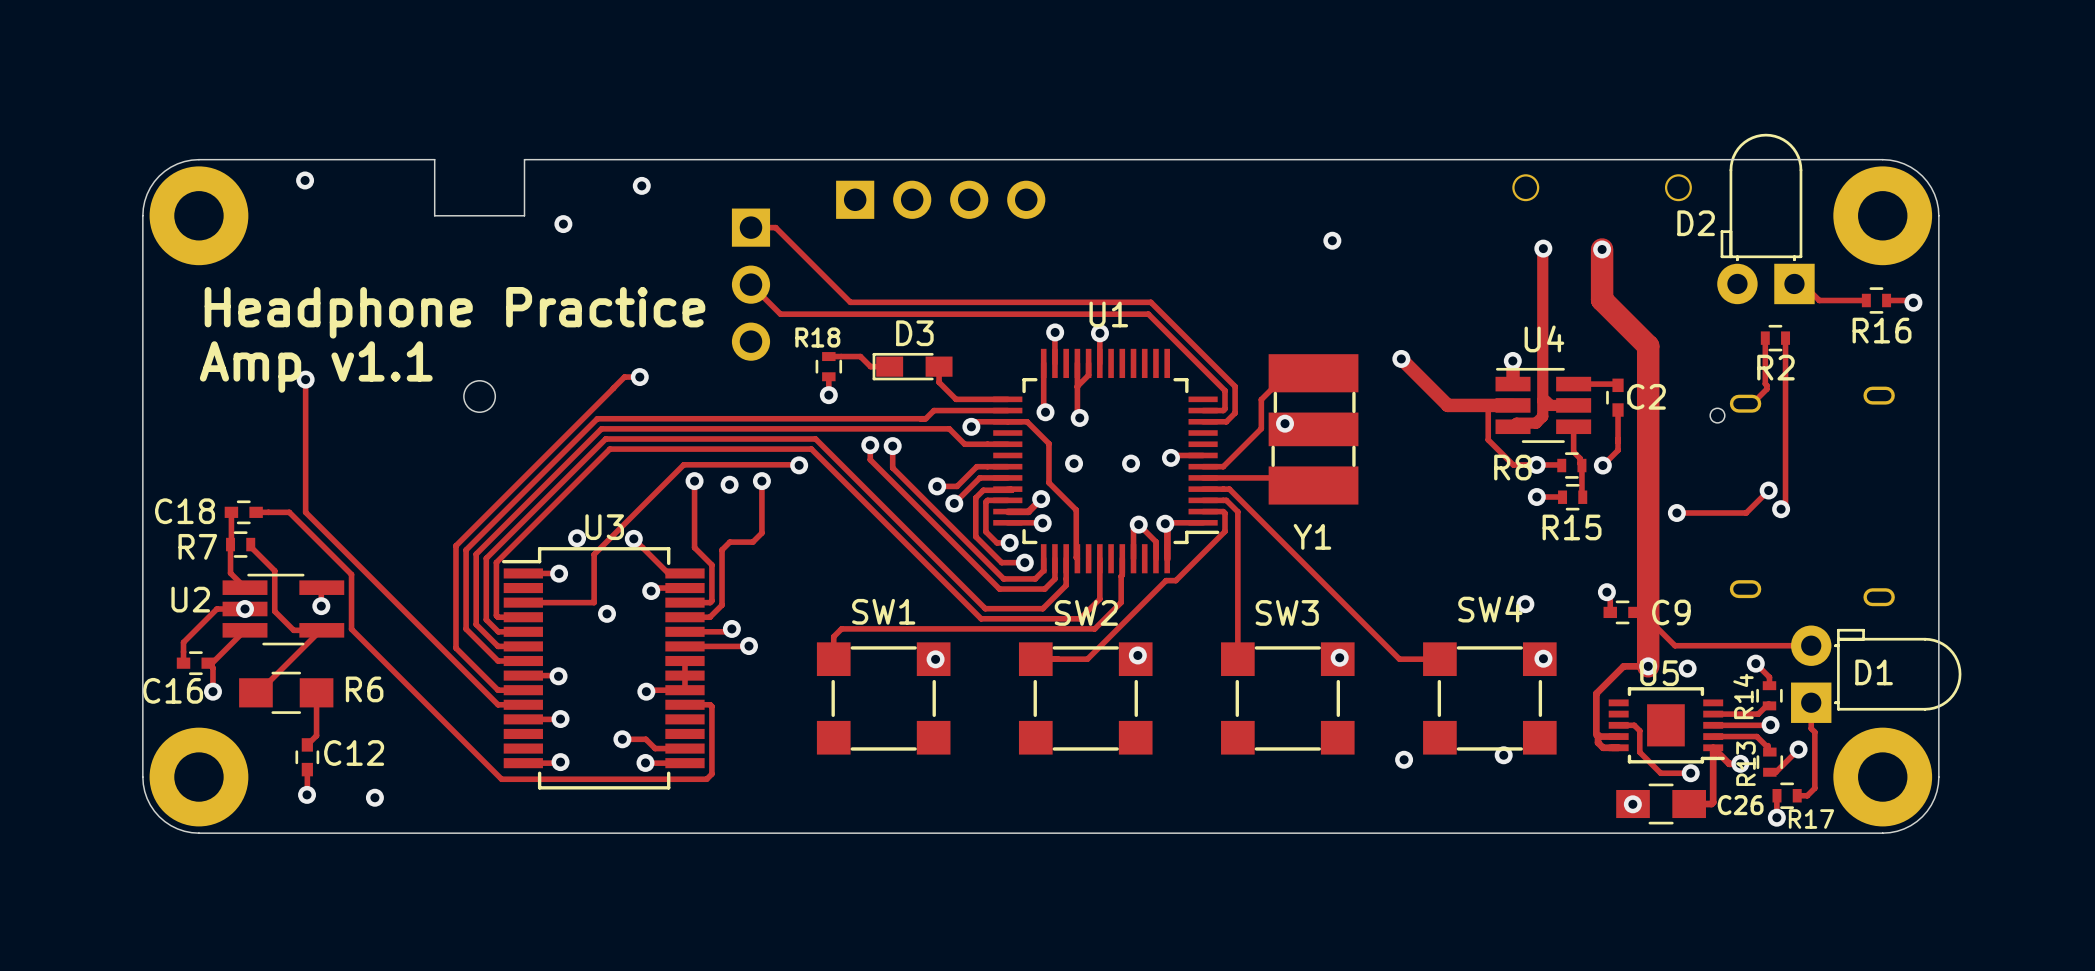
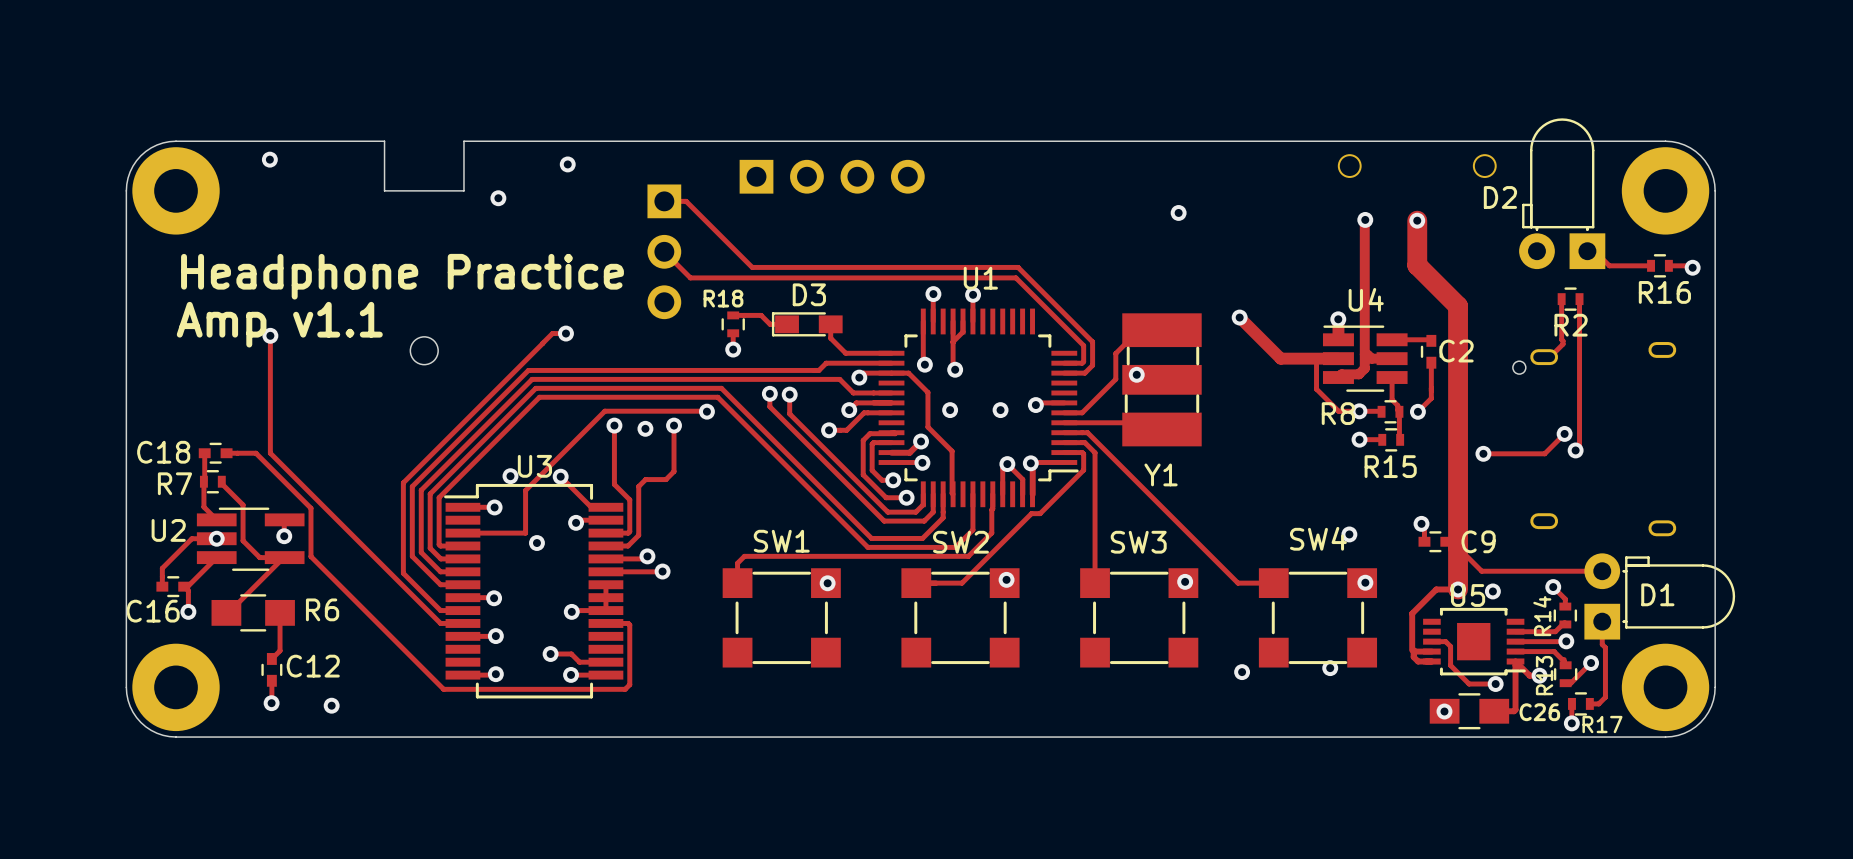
track: none -> (891, 402) (856, 402) (849, 410)
track: (1007, 477) (979, 477) (954, 503) -> none
via position: (954, 503) -> (849, 410)

